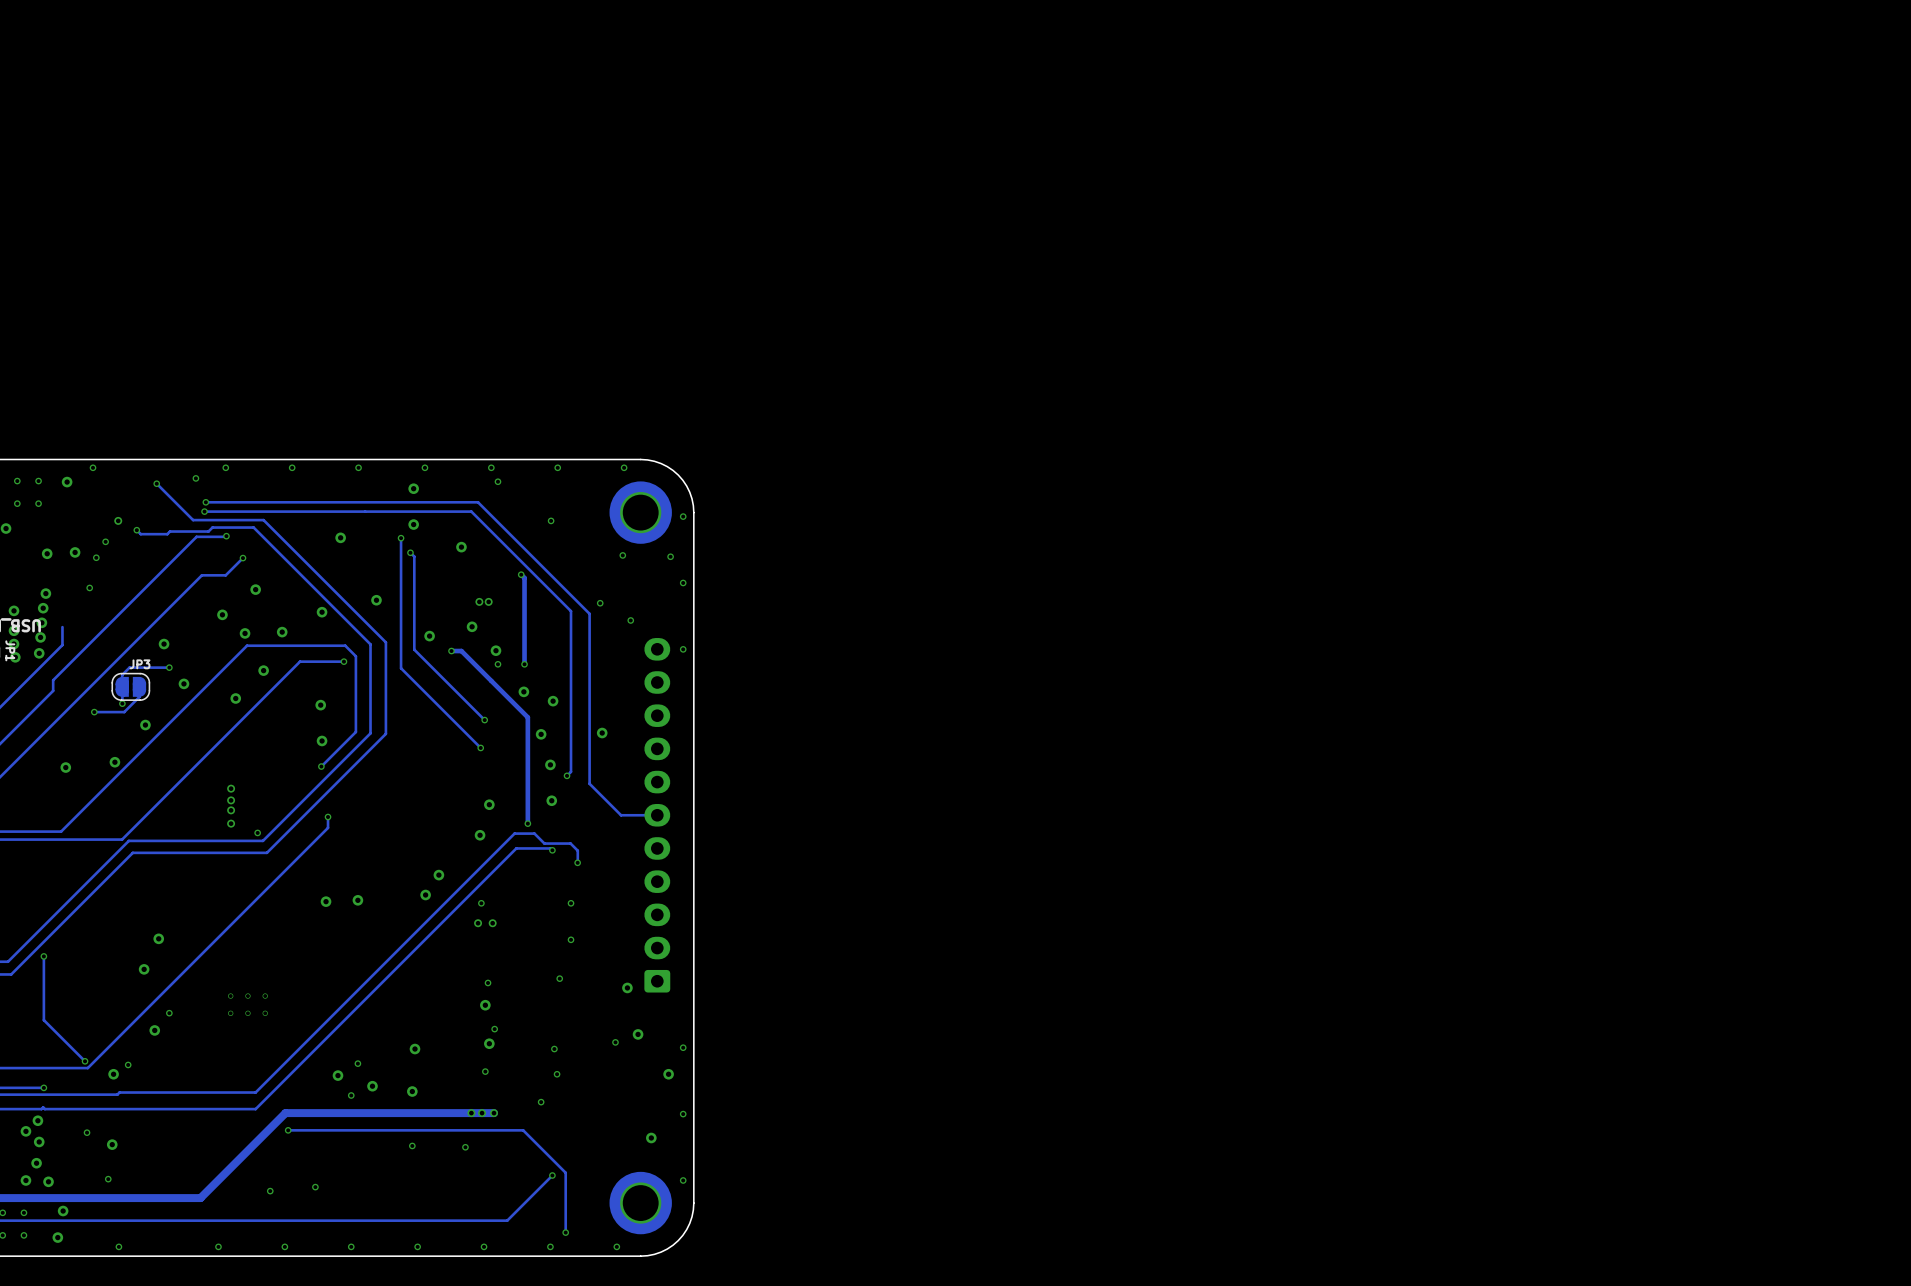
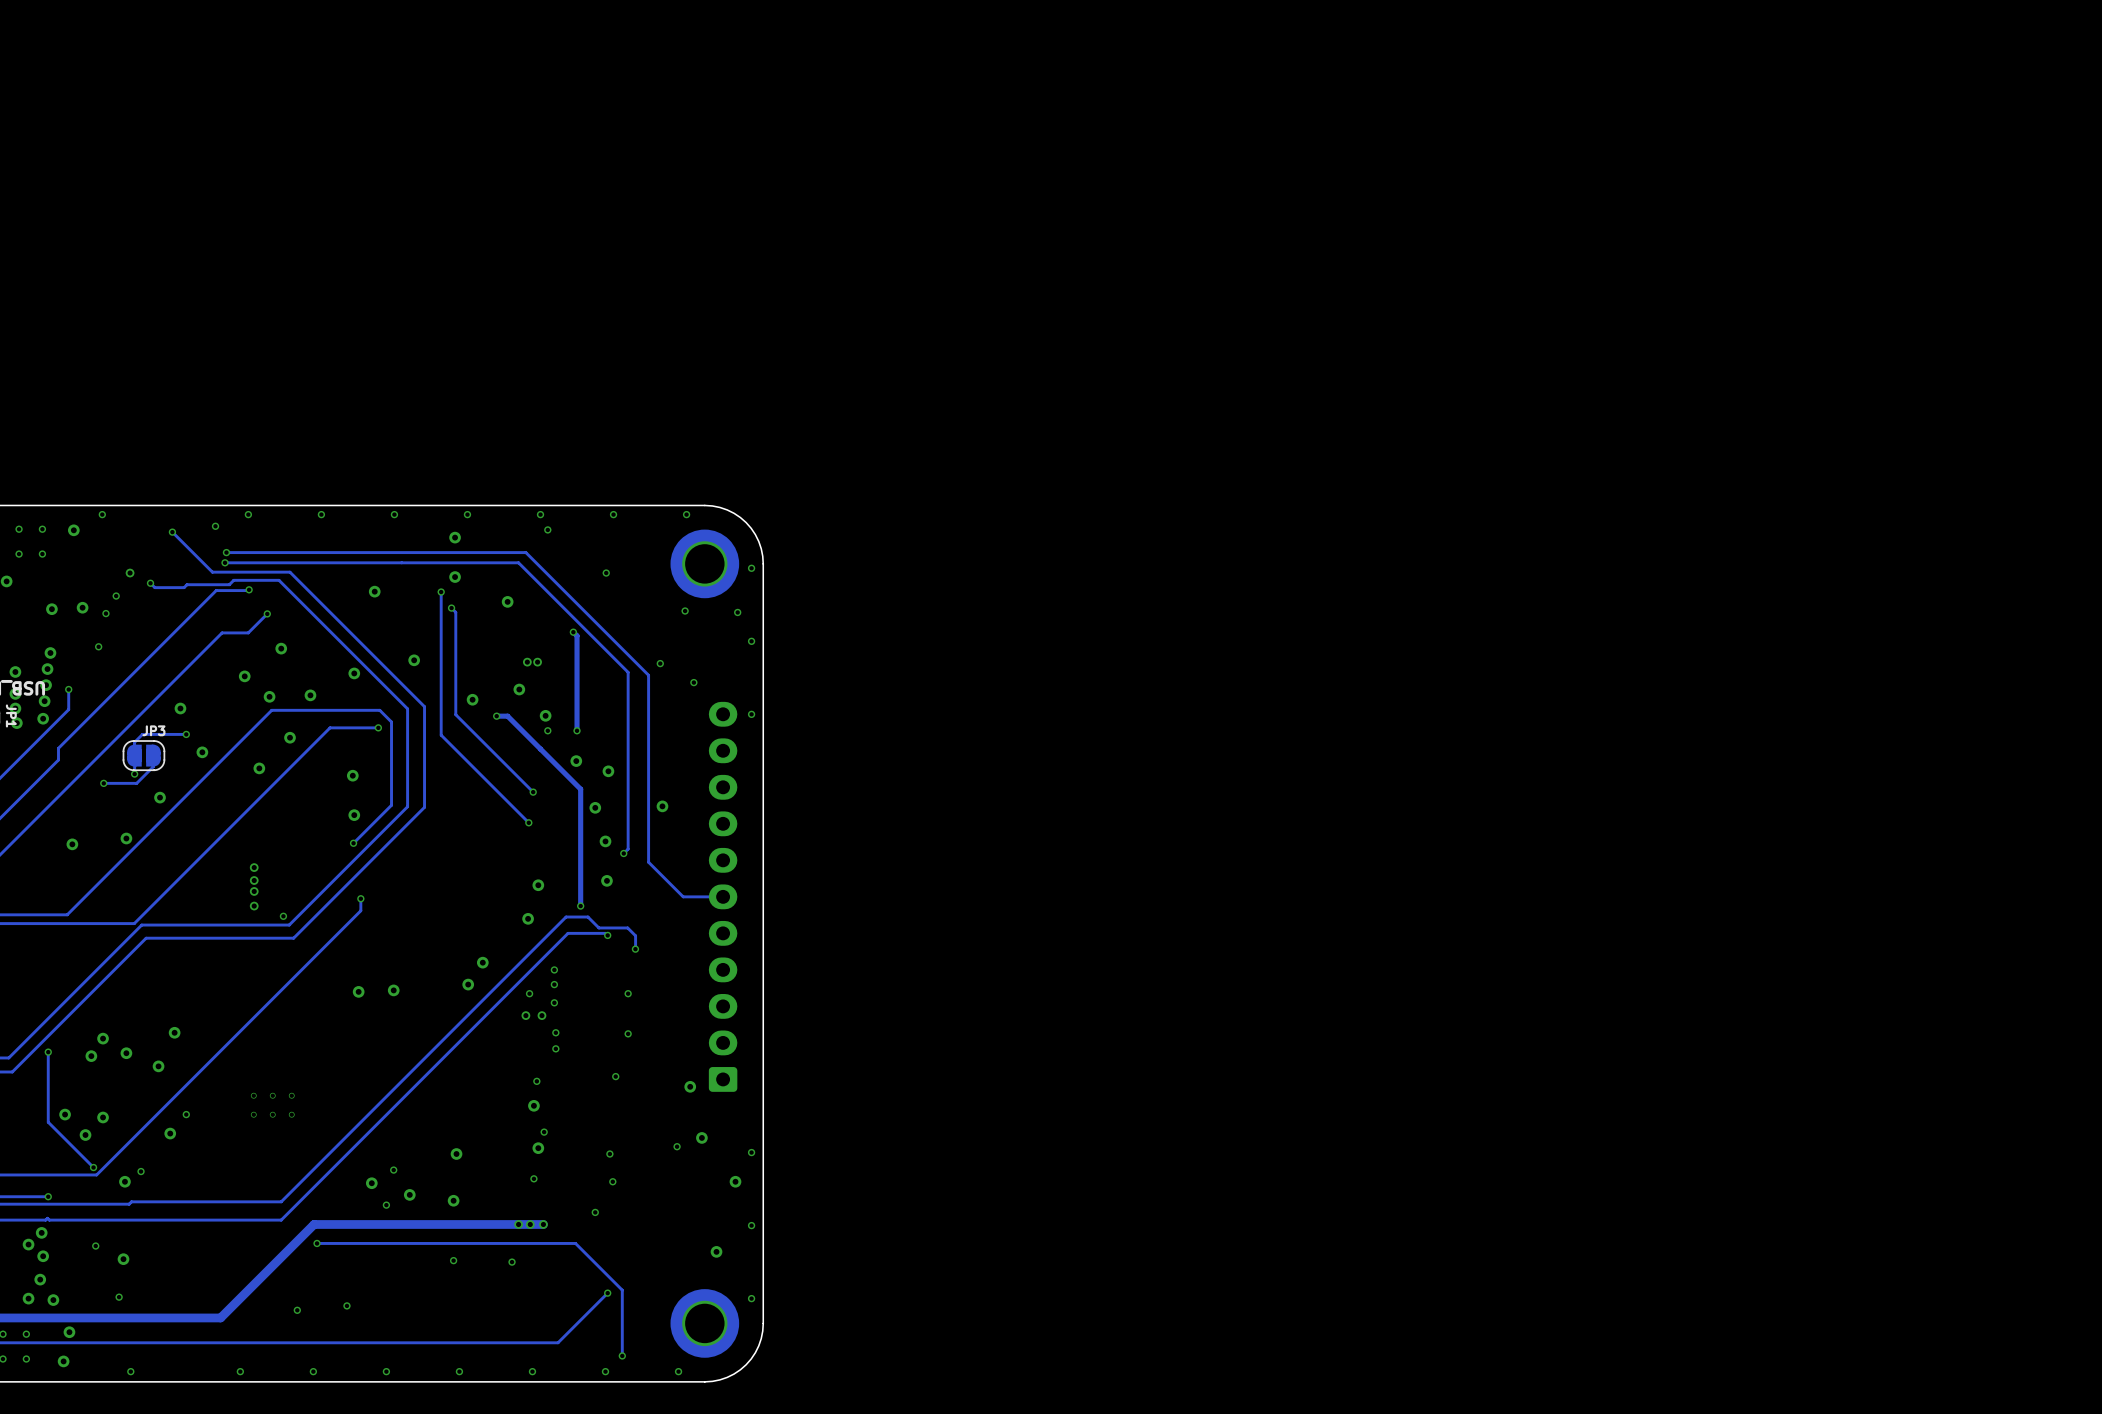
via: none -> (68, 689)
via: none -> (554, 969)
via: none -> (554, 984)
via: none -> (554, 1002)
via: none -> (555, 1032)
via: none -> (103, 1038)
via: none -> (555, 1048)
via: none -> (126, 1053)
via: none -> (91, 1056)
via: none -> (65, 1114)
via: none -> (103, 1117)
via: none -> (85, 1135)

